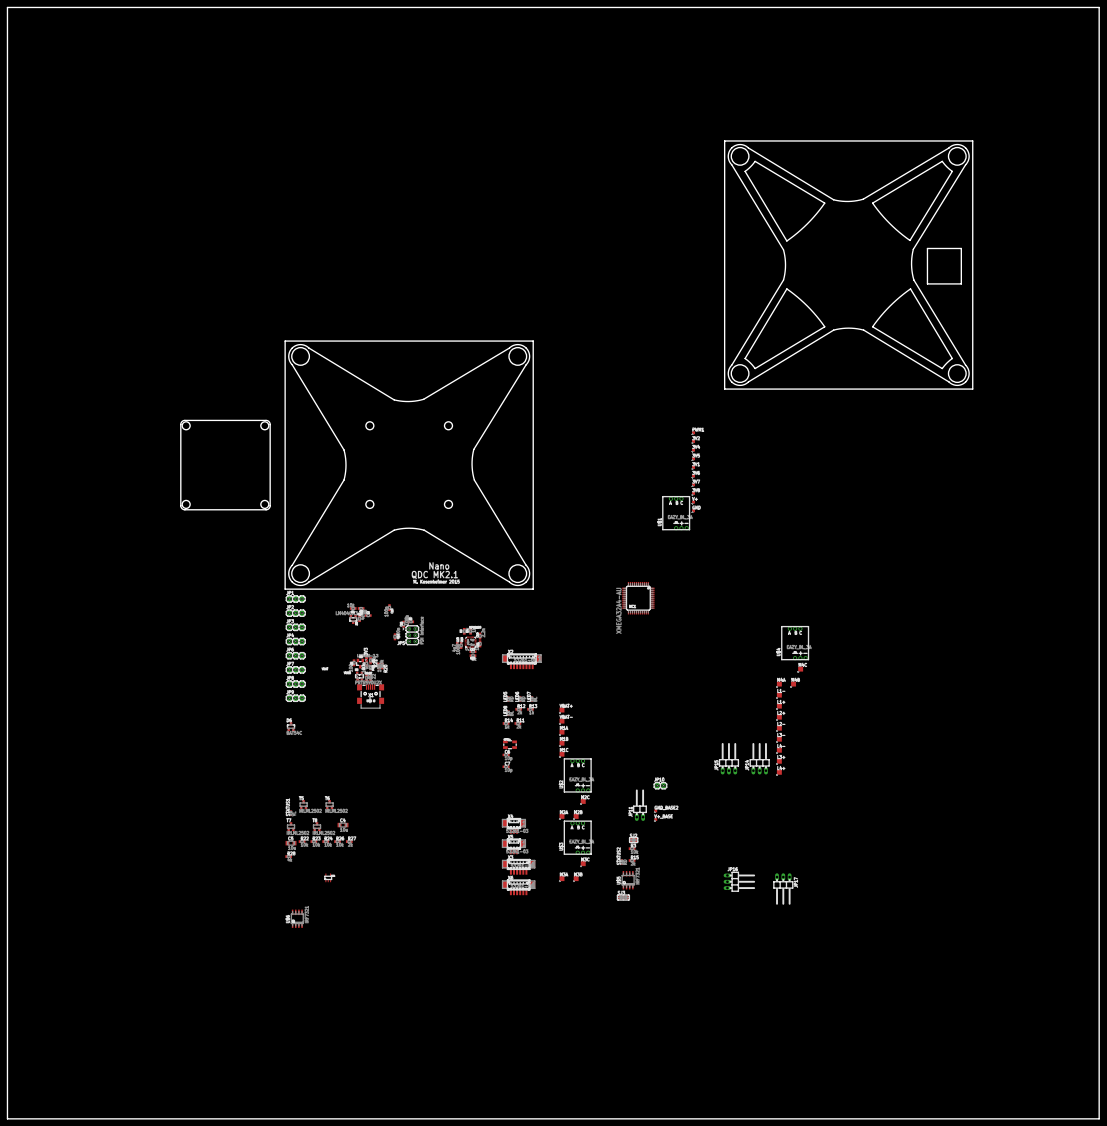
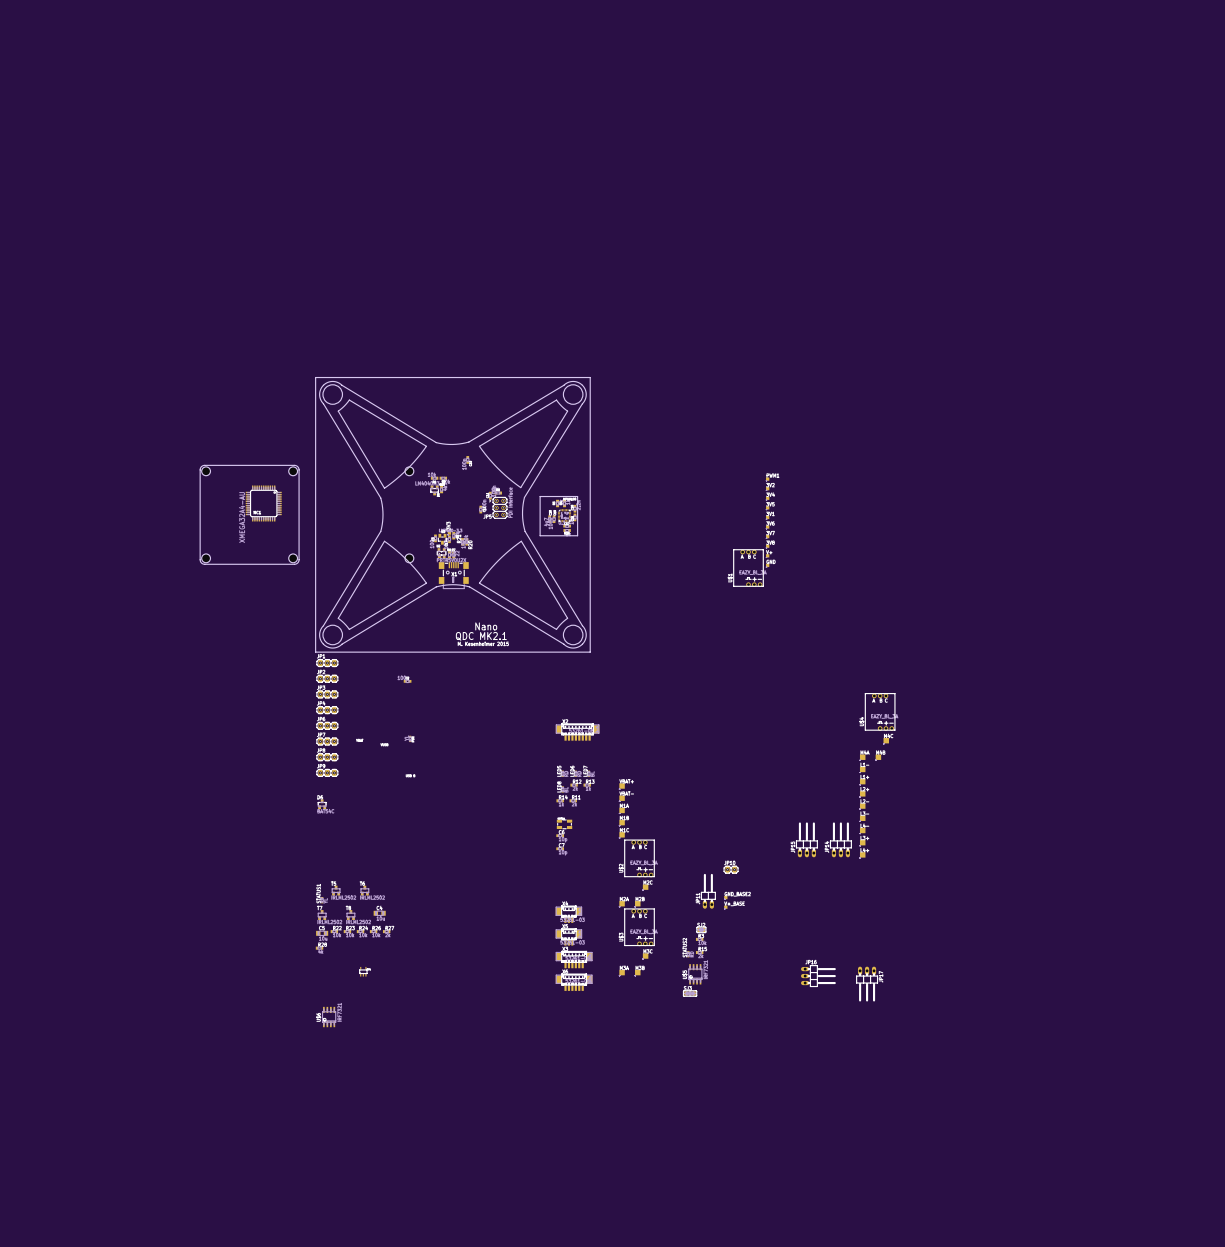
board edge: (7, 7) (1099, 7) (1099, 1118) (7, 1118) (7, 7) -> none
board edge: (724, 140) (724, 389) (972, 389) (972, 140) (724, 140) -> none
round board edge: [731, 147, 749, 166] -> none
round board edge: [948, 147, 967, 166] -> none
board edge: (731, 148) (728, 153) (729, 161) (783, 249) (785, 264) (783, 280) (729, 368) (728, 376) (731, 381) (737, 385) (745, 384) (833, 330) (848, 328) (863, 330) (952, 384) (958, 385) (965, 381) (969, 374) (967, 368) (913, 280) (911, 264) (913, 249) (967, 161) (969, 155) (965, 148) (959, 144) (952, 145) (863, 199) (848, 201) (833, 199) (745, 145) (738, 144) (731, 148) -> none
board edge: (755, 161) (824, 203) (807, 223) (786, 241) (745, 171) (755, 161) -> none
board edge: (942, 161) (872, 203) (889, 223) (909, 240) (952, 171) (942, 161) -> none
board edge: (927, 248) (927, 283) (961, 283) (961, 248) (927, 248) -> none
board edge: (786, 288) (745, 358) (755, 368) (824, 326) (807, 306) (786, 288) -> none
board edge: (910, 288) (952, 358) (942, 368) (872, 326) (889, 306) (910, 288) -> none
board edge: none -> (349, 400) (426, 446) (407, 469) (384, 488) (338, 411) (349, 400)
board edge: none -> (556, 400) (479, 446) (498, 468) (520, 487) (567, 411) (556, 400)
round board edge: [731, 364, 749, 383] -> none
round board edge: [948, 364, 967, 383] -> none
hole: (448, 425) -> none
board edge: none -> (540, 496) (540, 535) (577, 535) (577, 496) (540, 496)
drawing: none -> [489, 499, 492, 503]
board edge: none -> (384, 541) (338, 618) (349, 629) (426, 583) (407, 560) (384, 541)
board edge: none -> (521, 541) (567, 618) (556, 629) (479, 583) (498, 560) (521, 541)
hole: (448, 504) -> none
part position: (638, 598) -> (263, 503)
part position: (389, 607) -> (467, 459)
part position: (353, 608) -> (434, 478)
part position: (361, 608) -> (443, 478)
part position: (359, 618) -> (441, 489)
part position: (353, 619) -> (434, 490)
part position: (410, 621) -> (498, 493)
part position: (403, 624) -> (490, 495)
drawing: [402, 627, 405, 631] -> none
part position: (464, 631) -> (557, 503)
part position: (470, 631) -> (564, 503)
part position: (412, 635) -> (500, 507)
part position: (394, 636) -> (480, 509)
part position: (480, 636) -> (574, 508)
part position: (470, 642) -> (564, 515)
part position: (480, 643) -> (574, 517)
part position: (457, 645) -> (549, 519)
part position: (461, 645) -> (554, 519)
part position: (472, 651) -> (567, 526)
part position: (472, 655) -> (567, 530)
part position: (366, 658) -> (449, 533)
part position: (370, 660) -> (453, 535)
part position: (354, 662) -> (435, 538)
part position: (360, 663) -> (442, 539)
part position: (366, 663) -> (449, 539)
part position: (378, 665) -> (462, 541)
part position: (382, 665) -> (466, 541)
part position: (359, 676) -> (441, 553)
part position: (366, 677) -> (449, 554)
part position: (370, 677) -> (453, 554)
part position: (370, 696) -> (453, 575)

